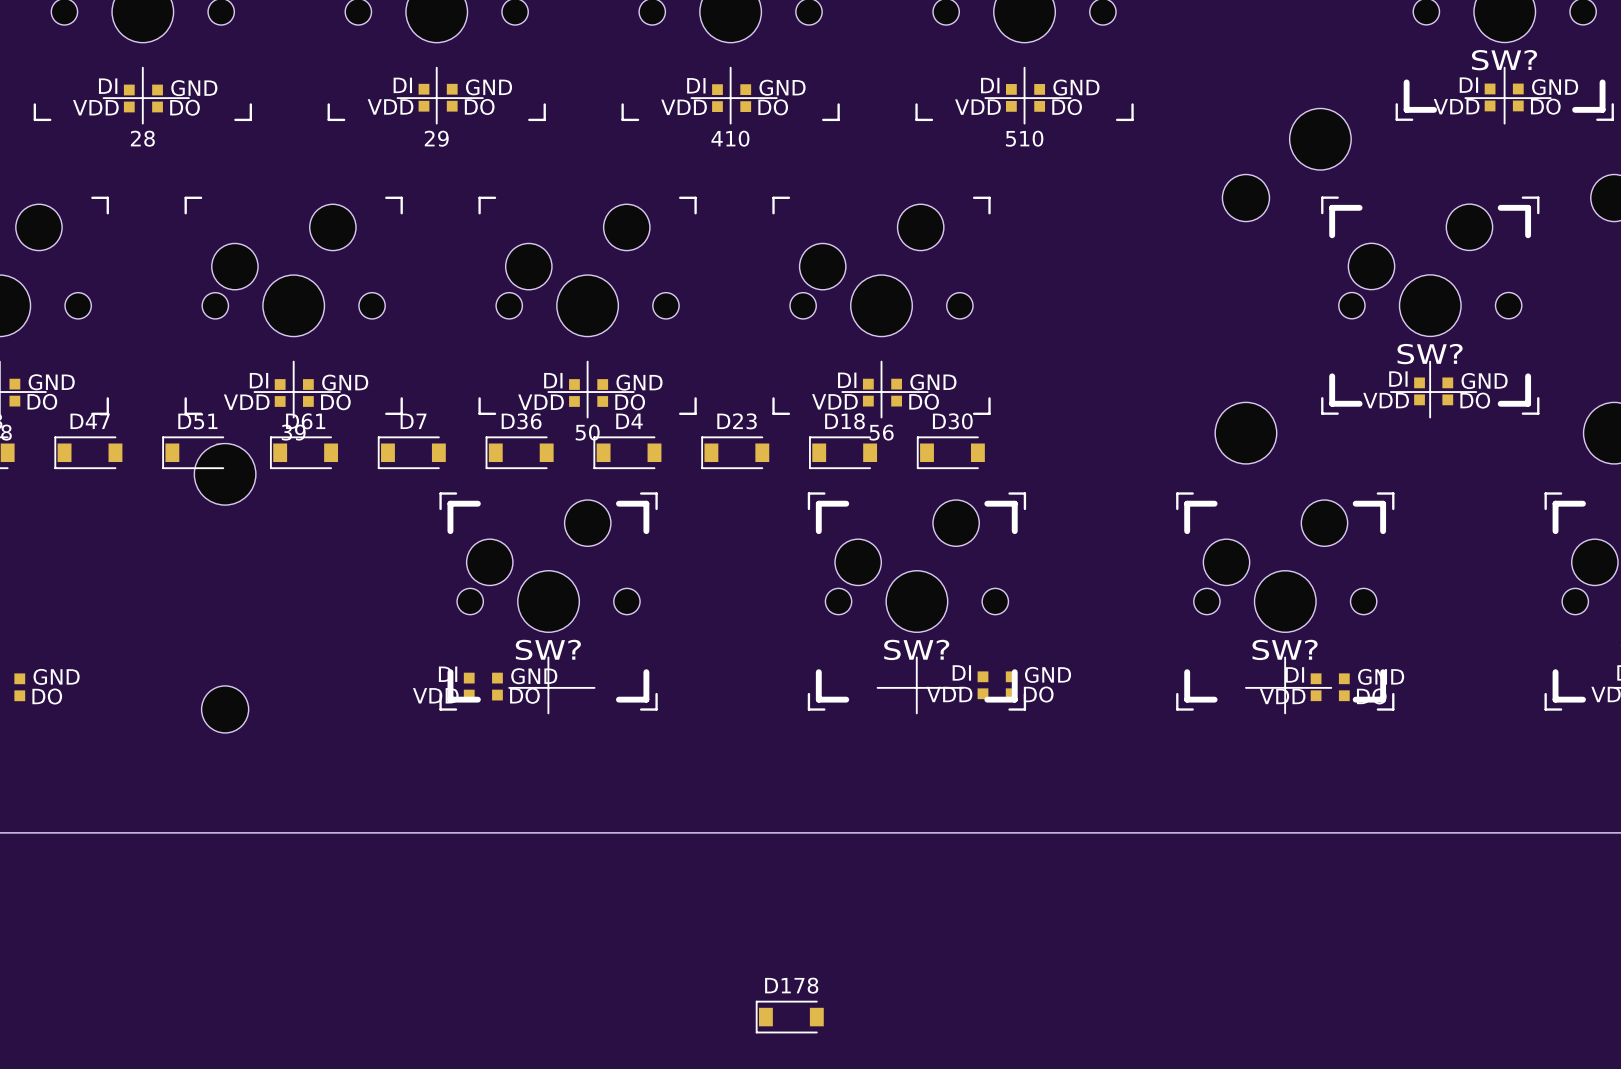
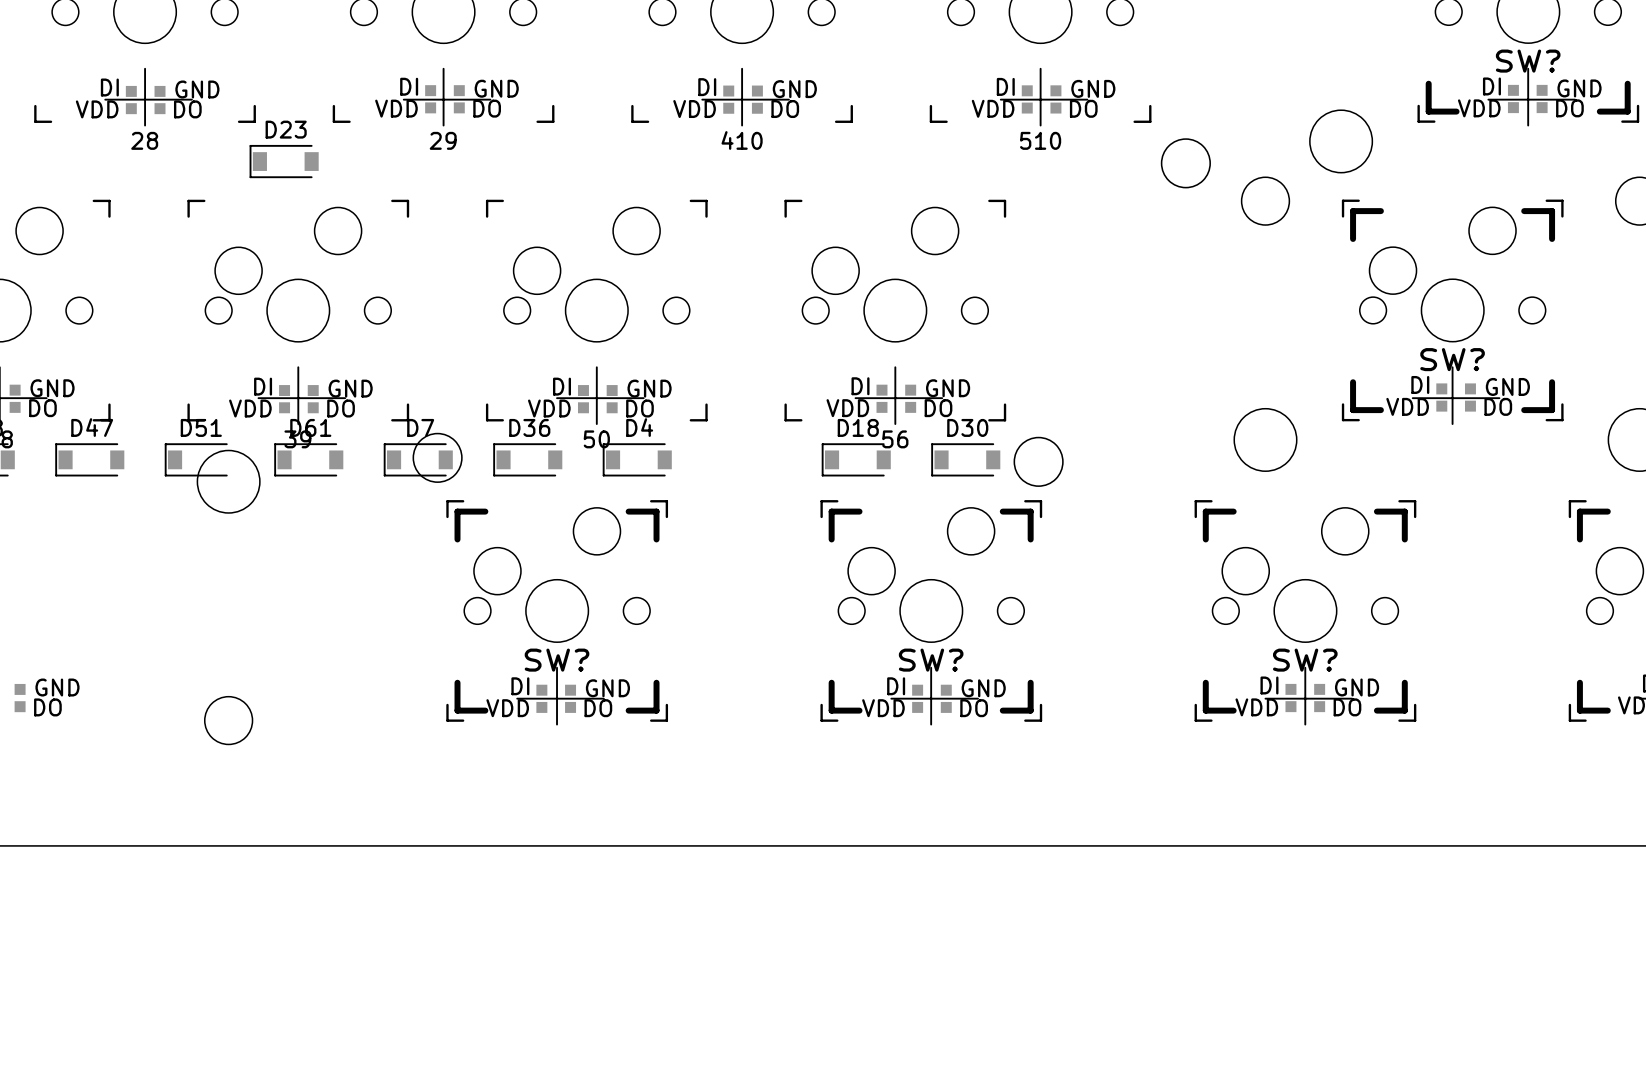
round board edge: none -> [1160, 138, 1211, 189]
round board edge: none -> [412, 432, 463, 483]
round board edge: none -> [1013, 436, 1064, 487]
D23 position: (735, 452) -> (284, 161)
part position: (997, 685) -> (931, 698)
part position: (483, 686) -> (556, 698)
part position: (1330, 687) -> (1305, 698)
D178: (789, 1017) -> none

